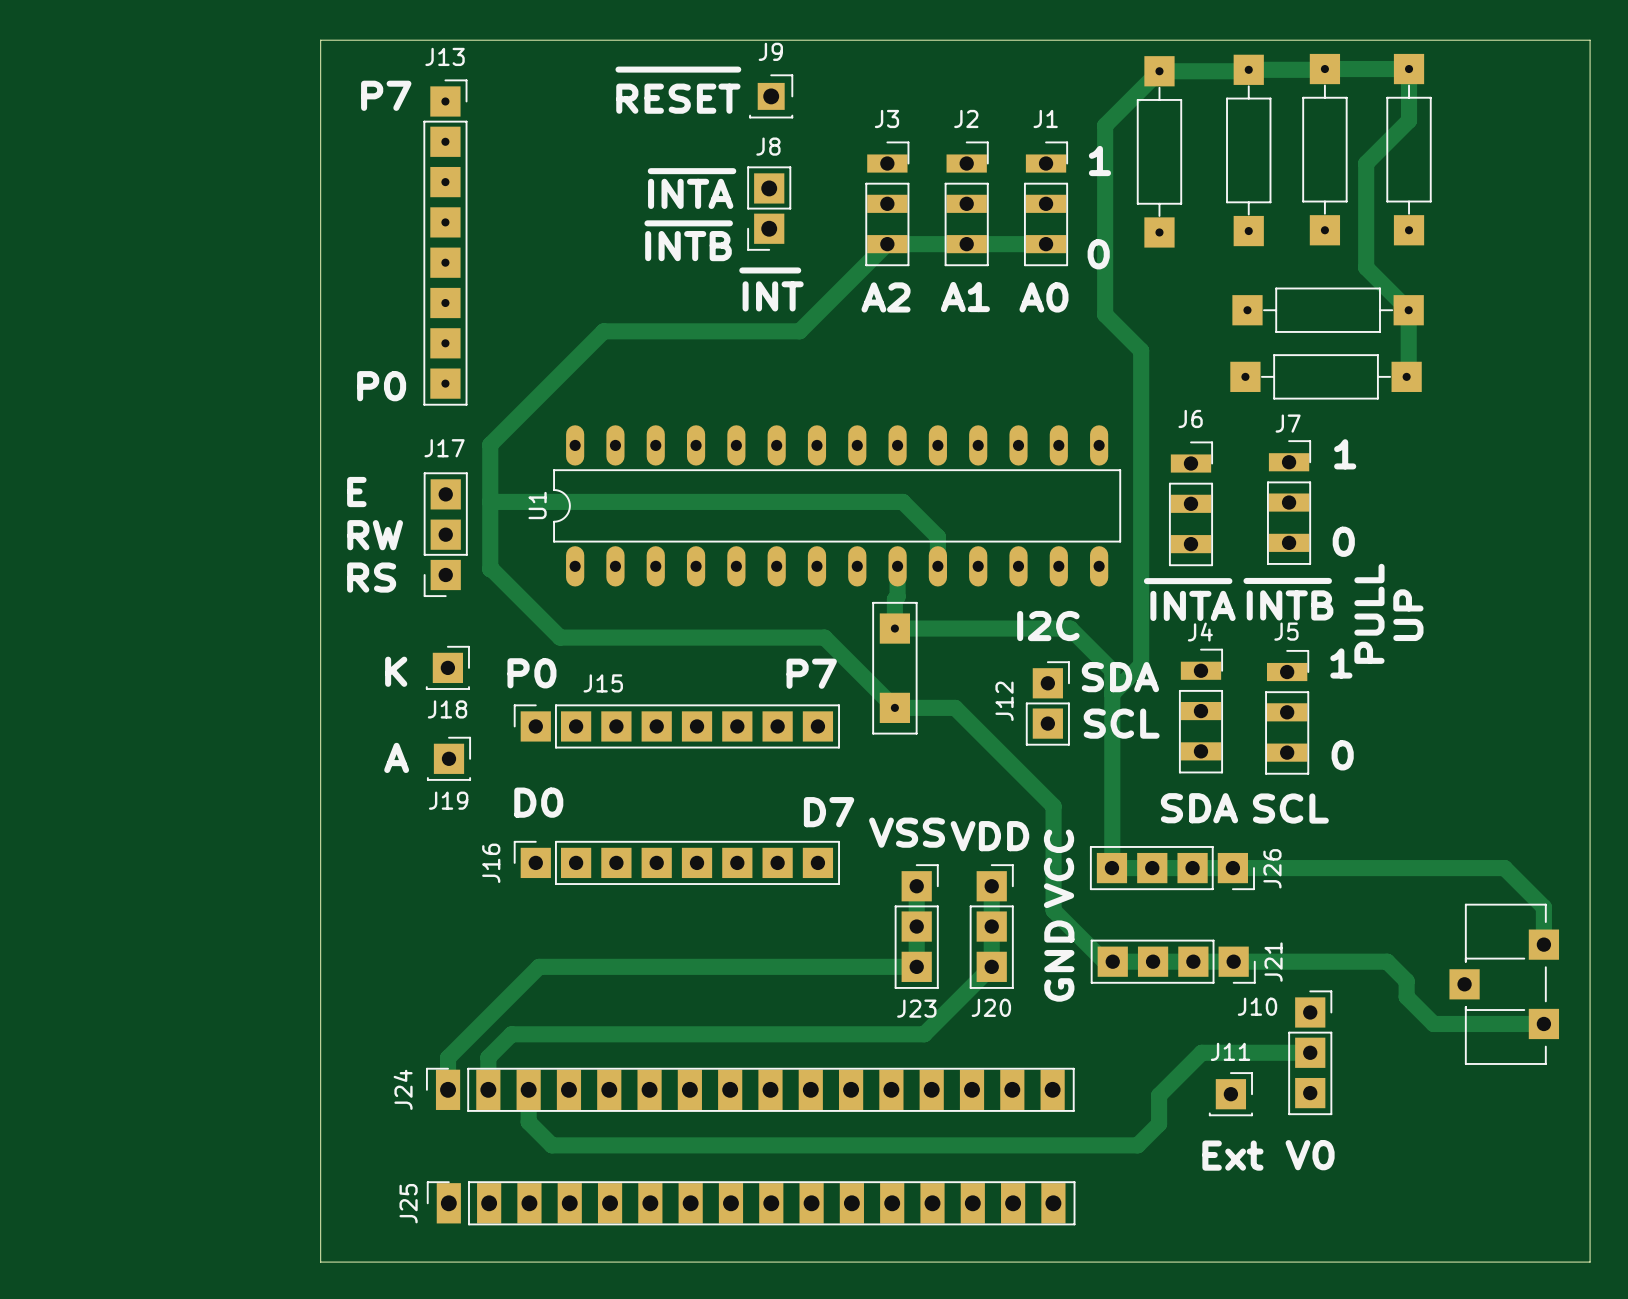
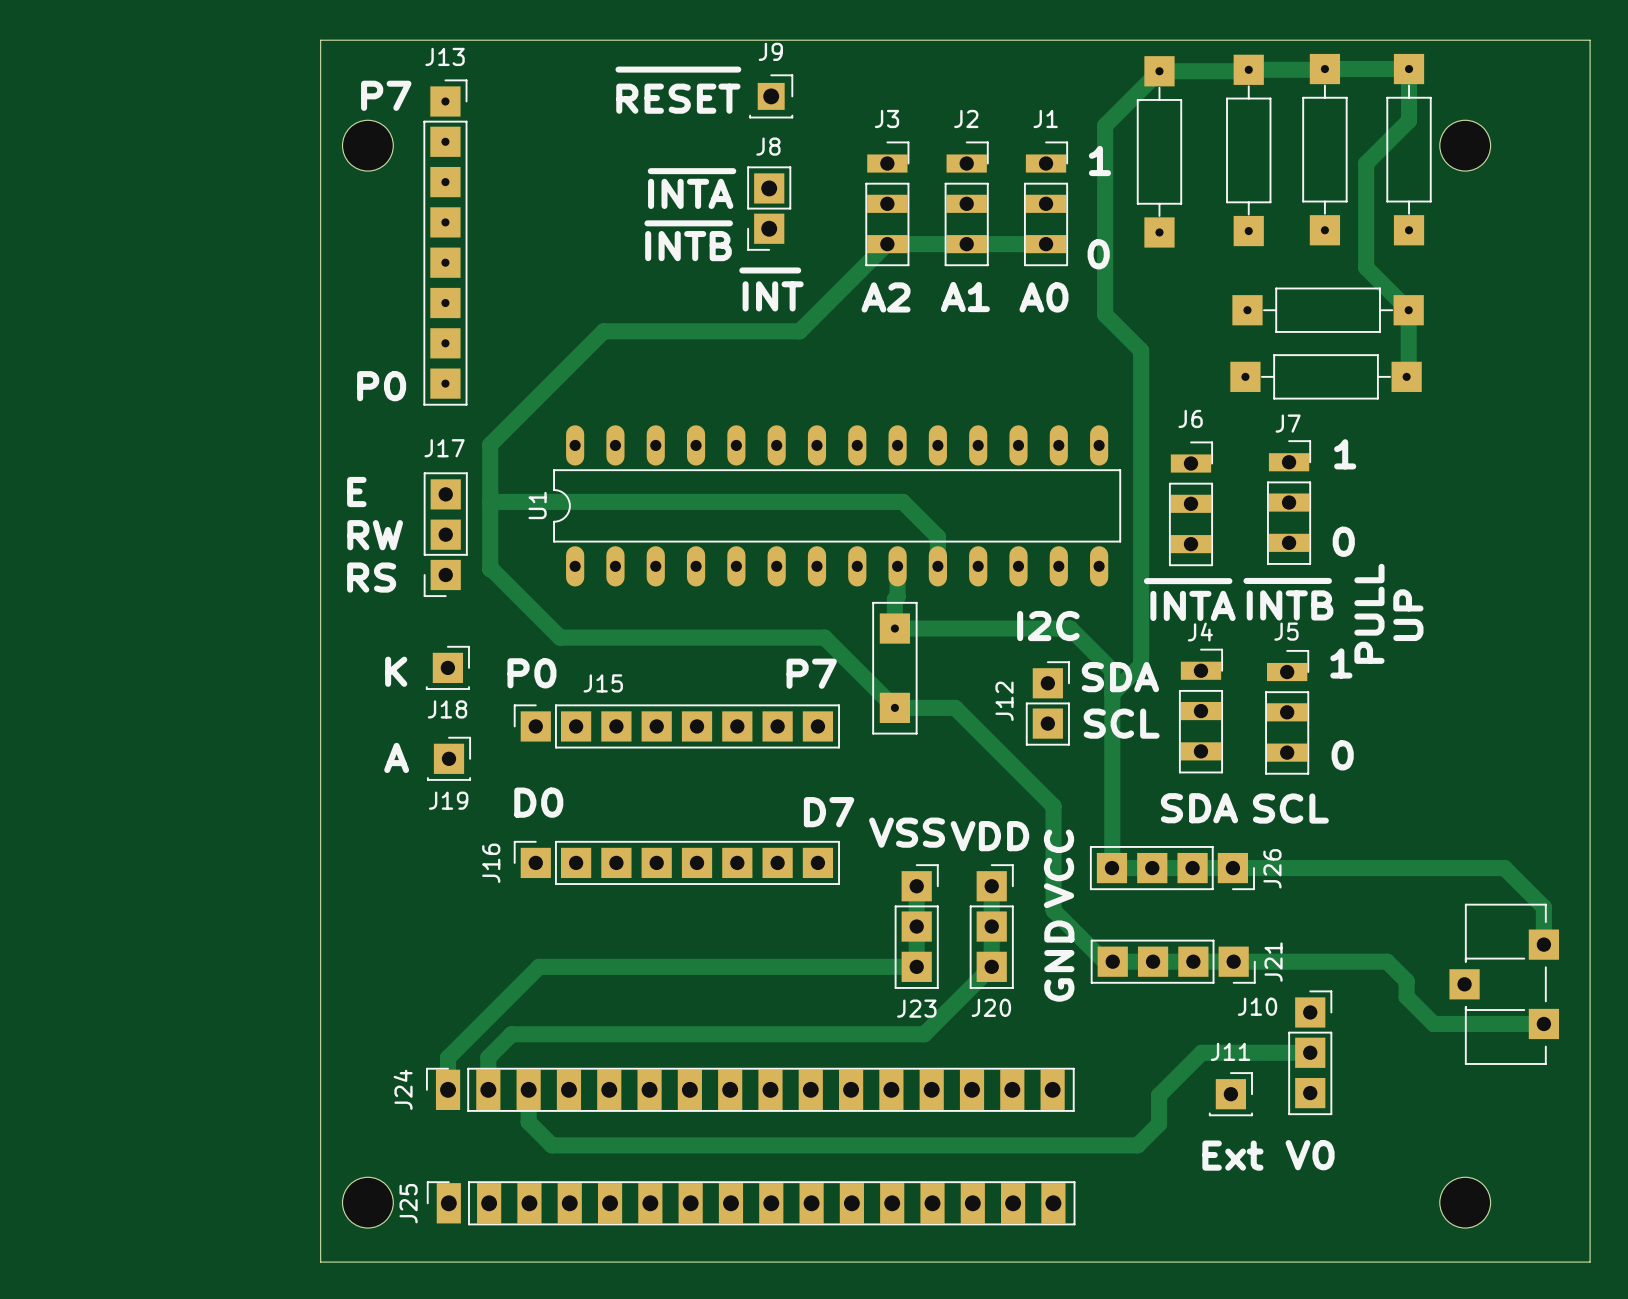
part: none -> (367, 145)
part: none -> (1465, 145)
part: none -> (367, 1202)
part: none -> (1465, 1202)

